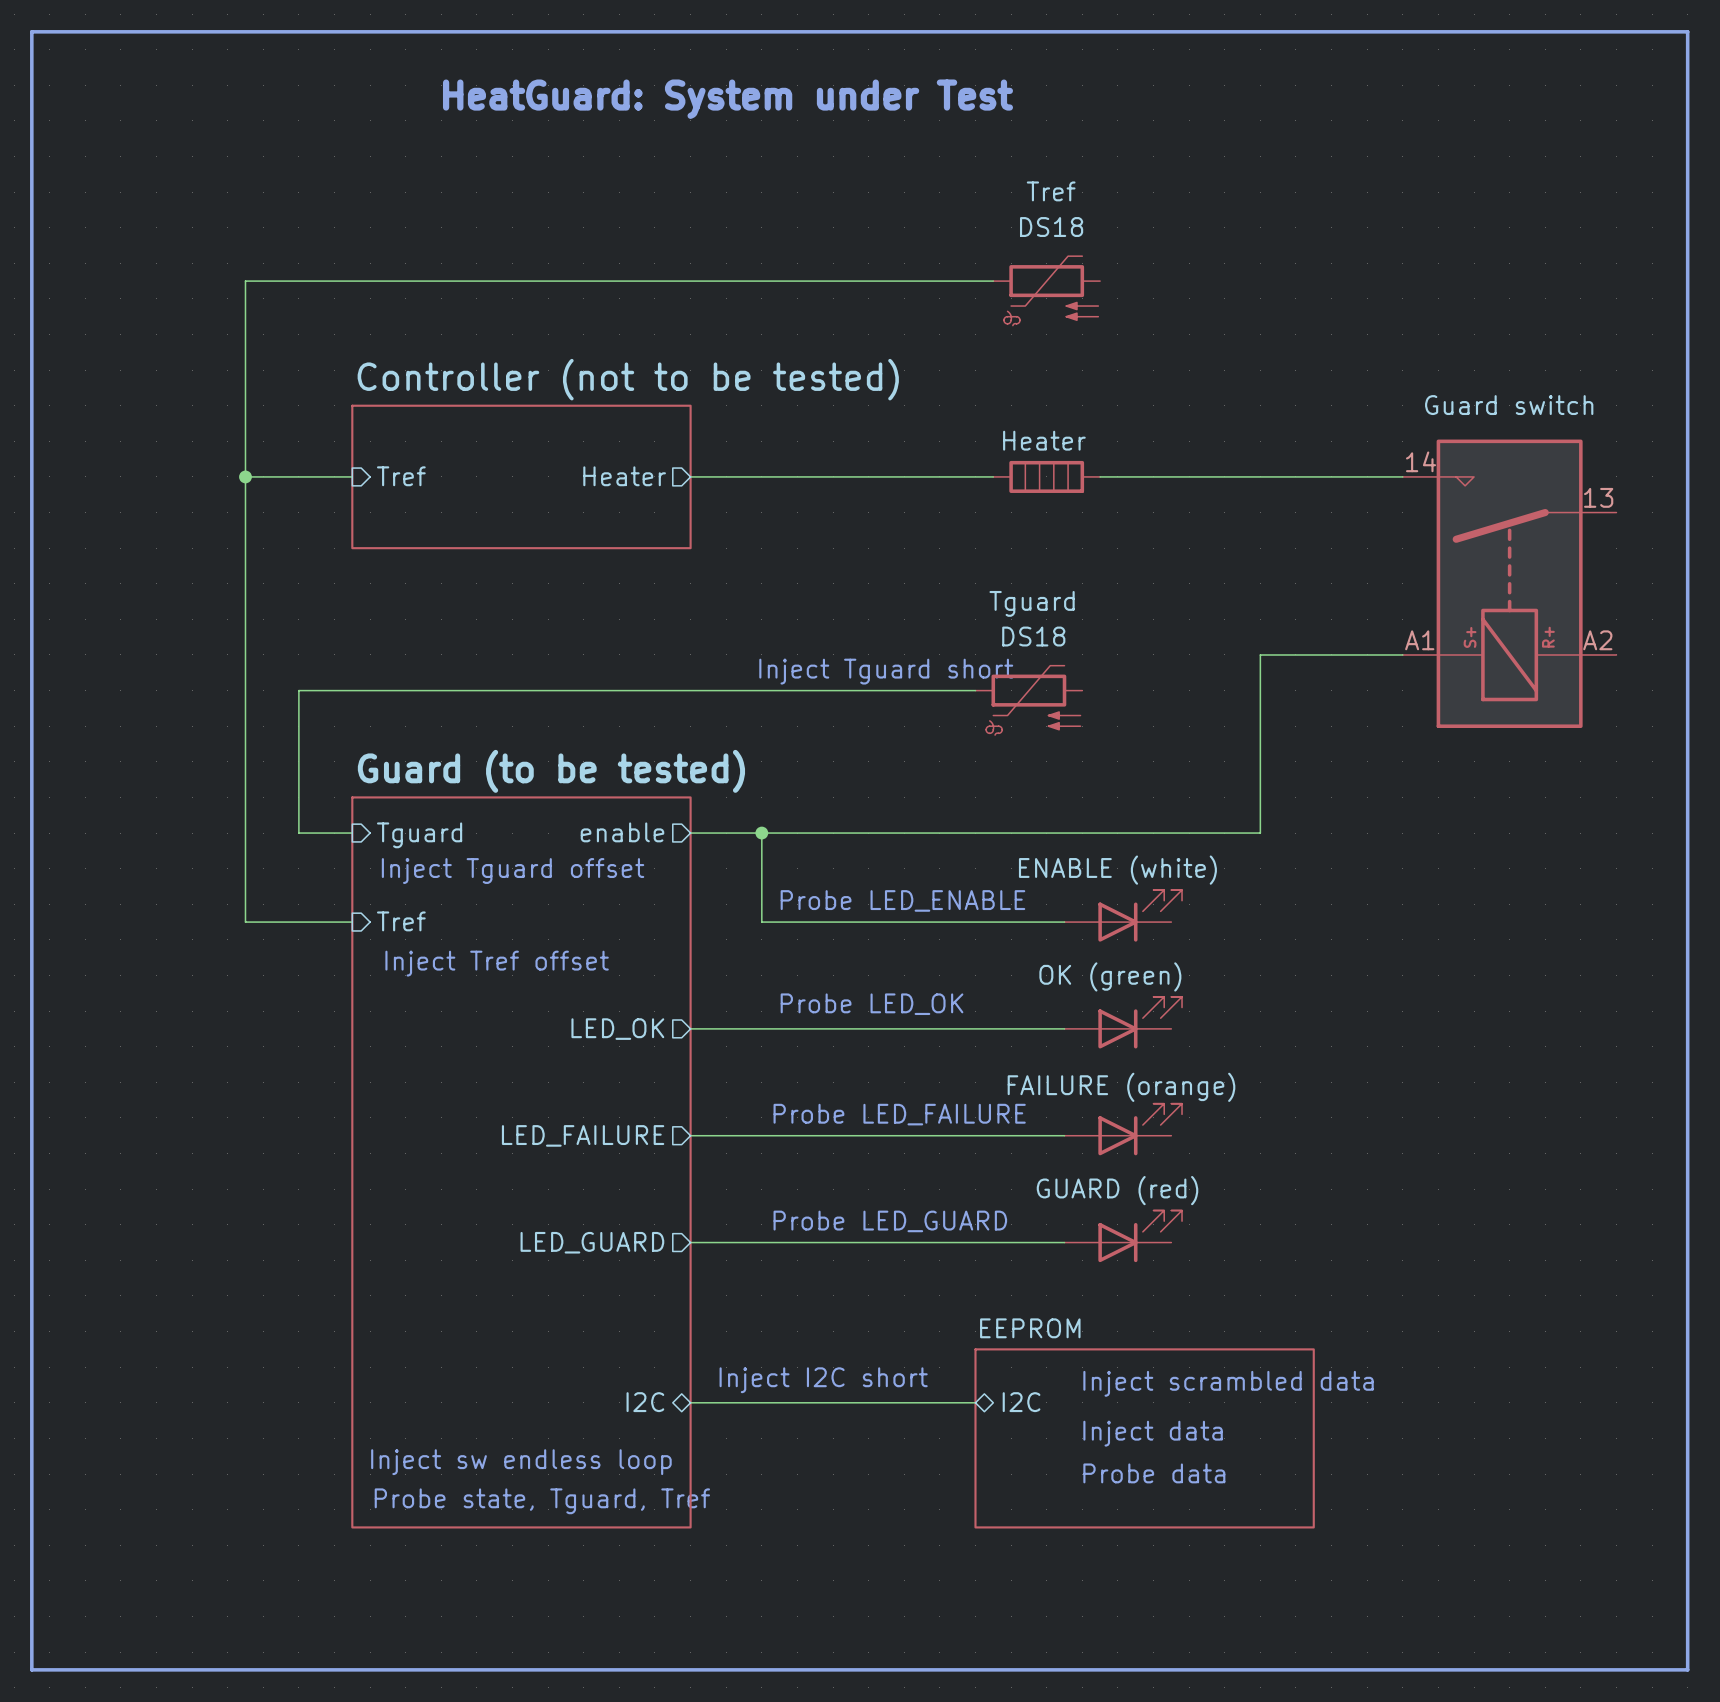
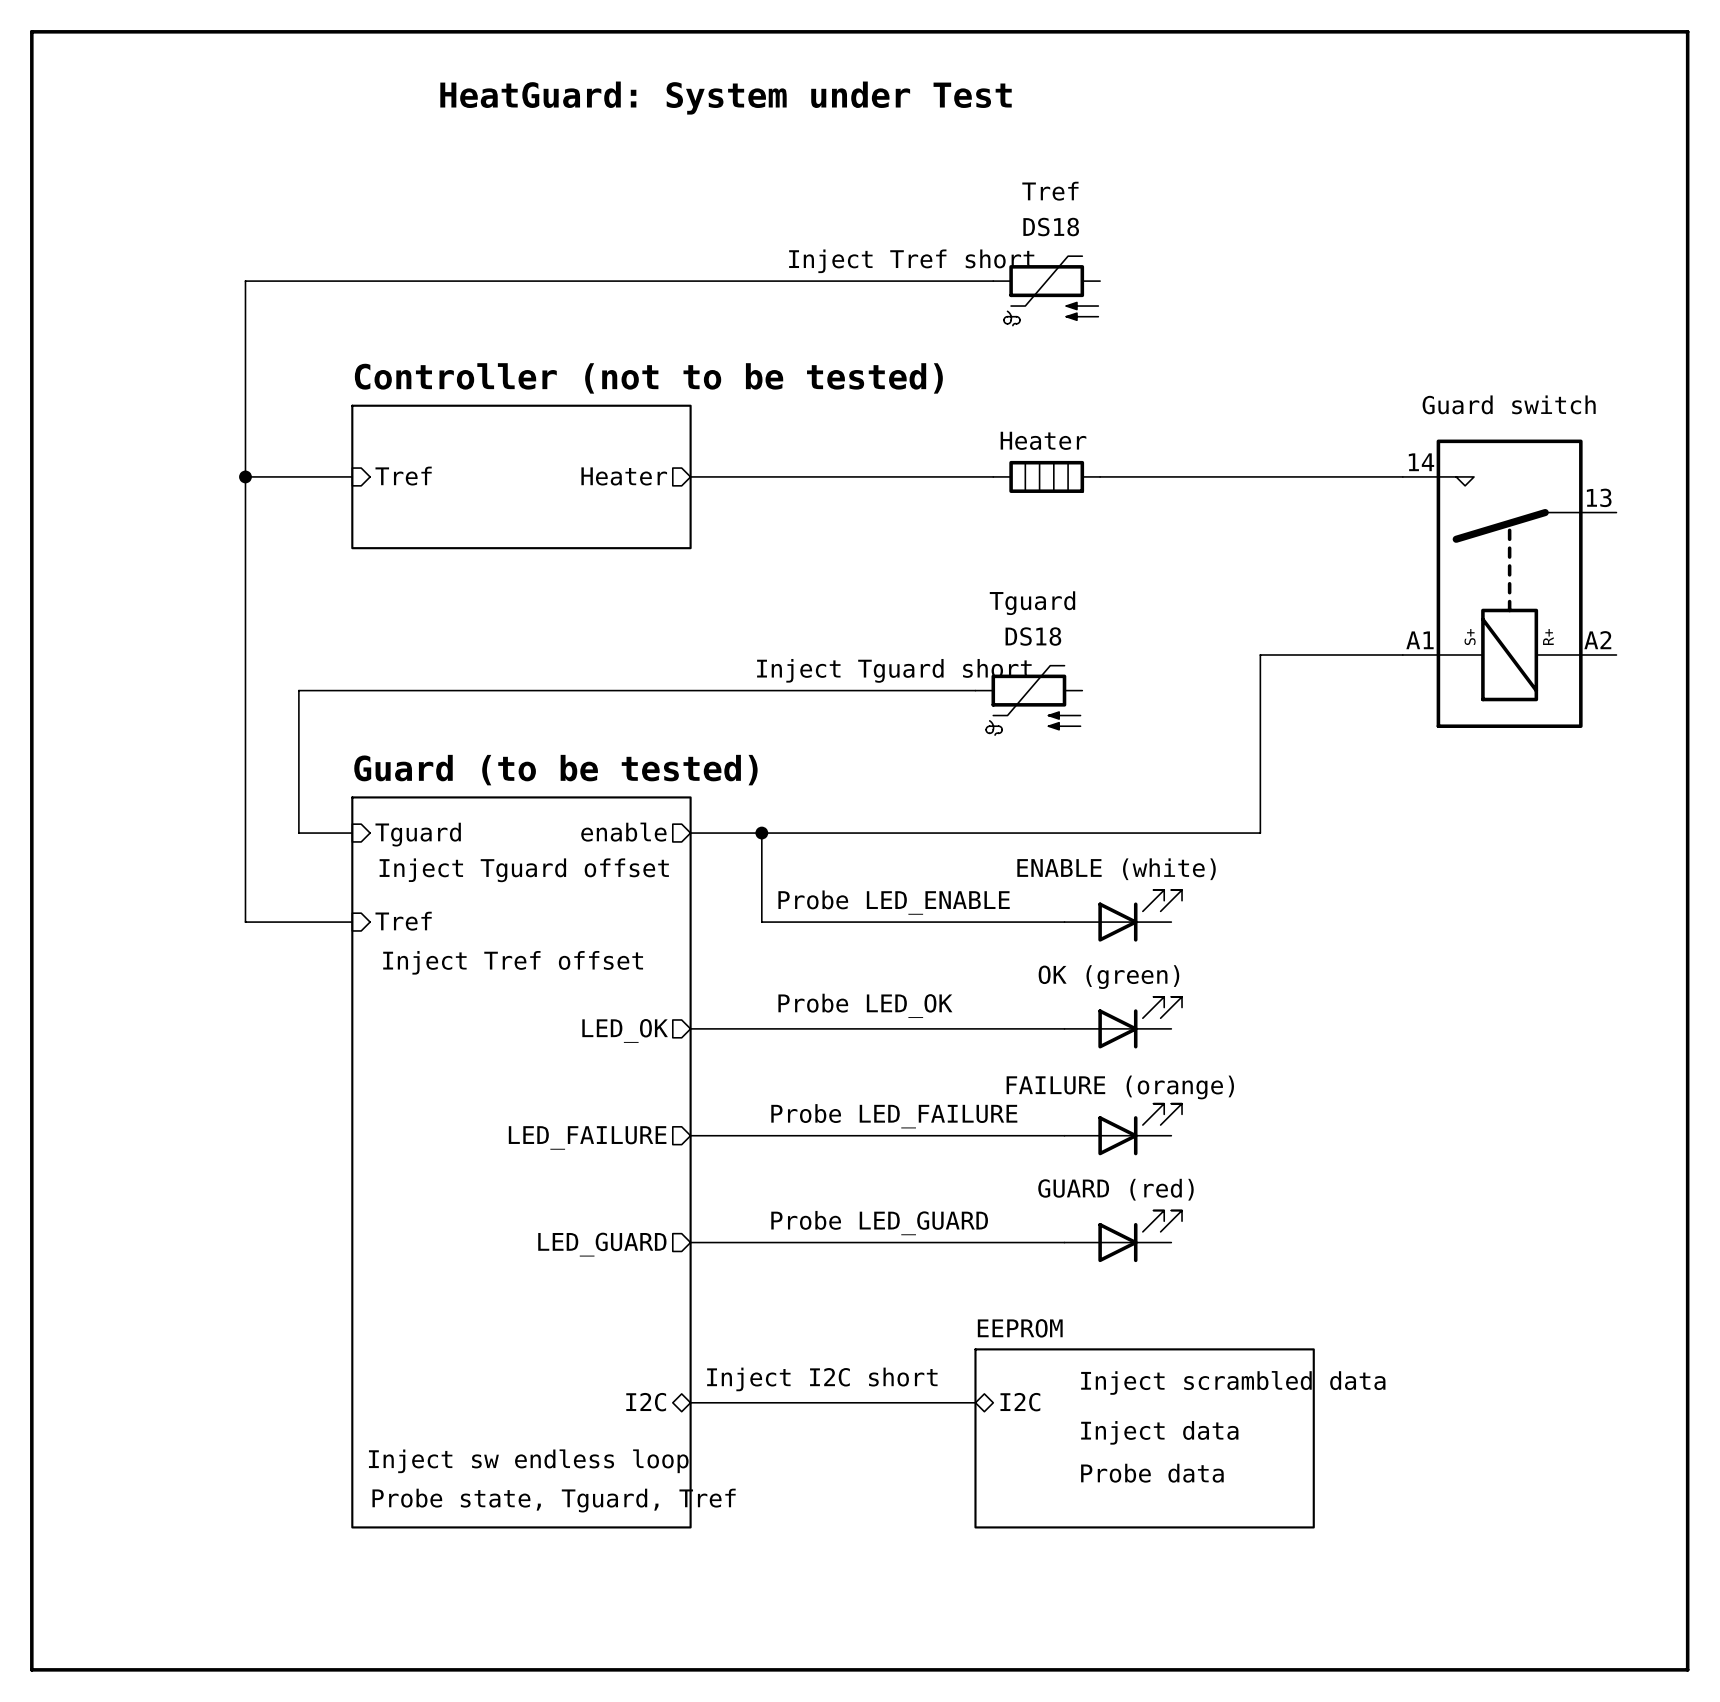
text: none -> Inject Tref short (911, 261)

